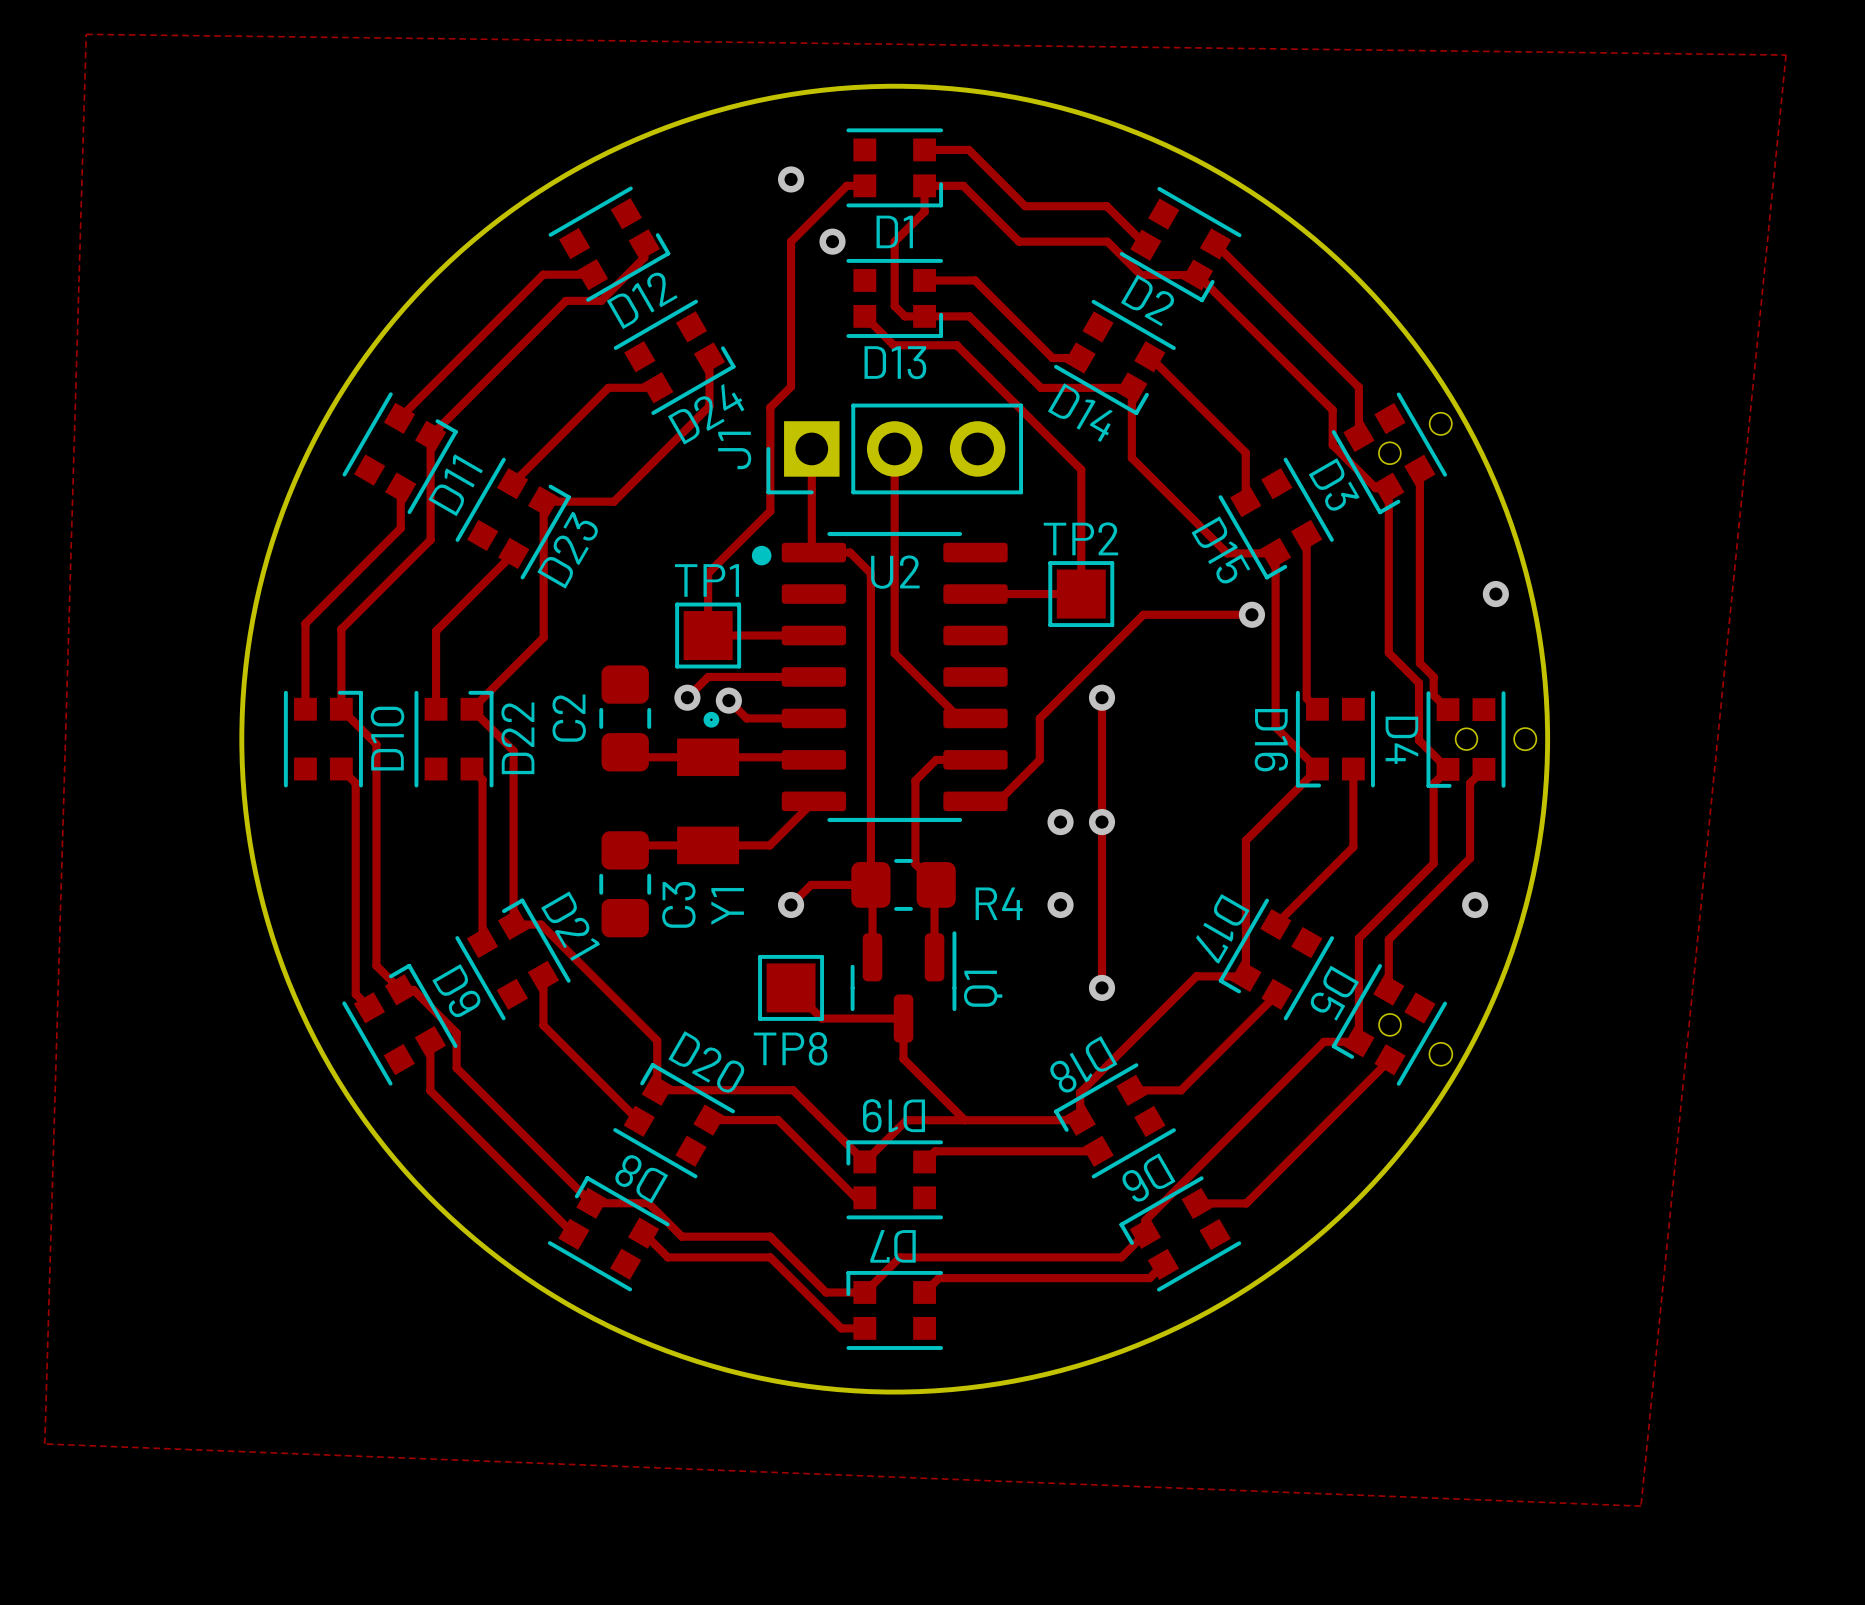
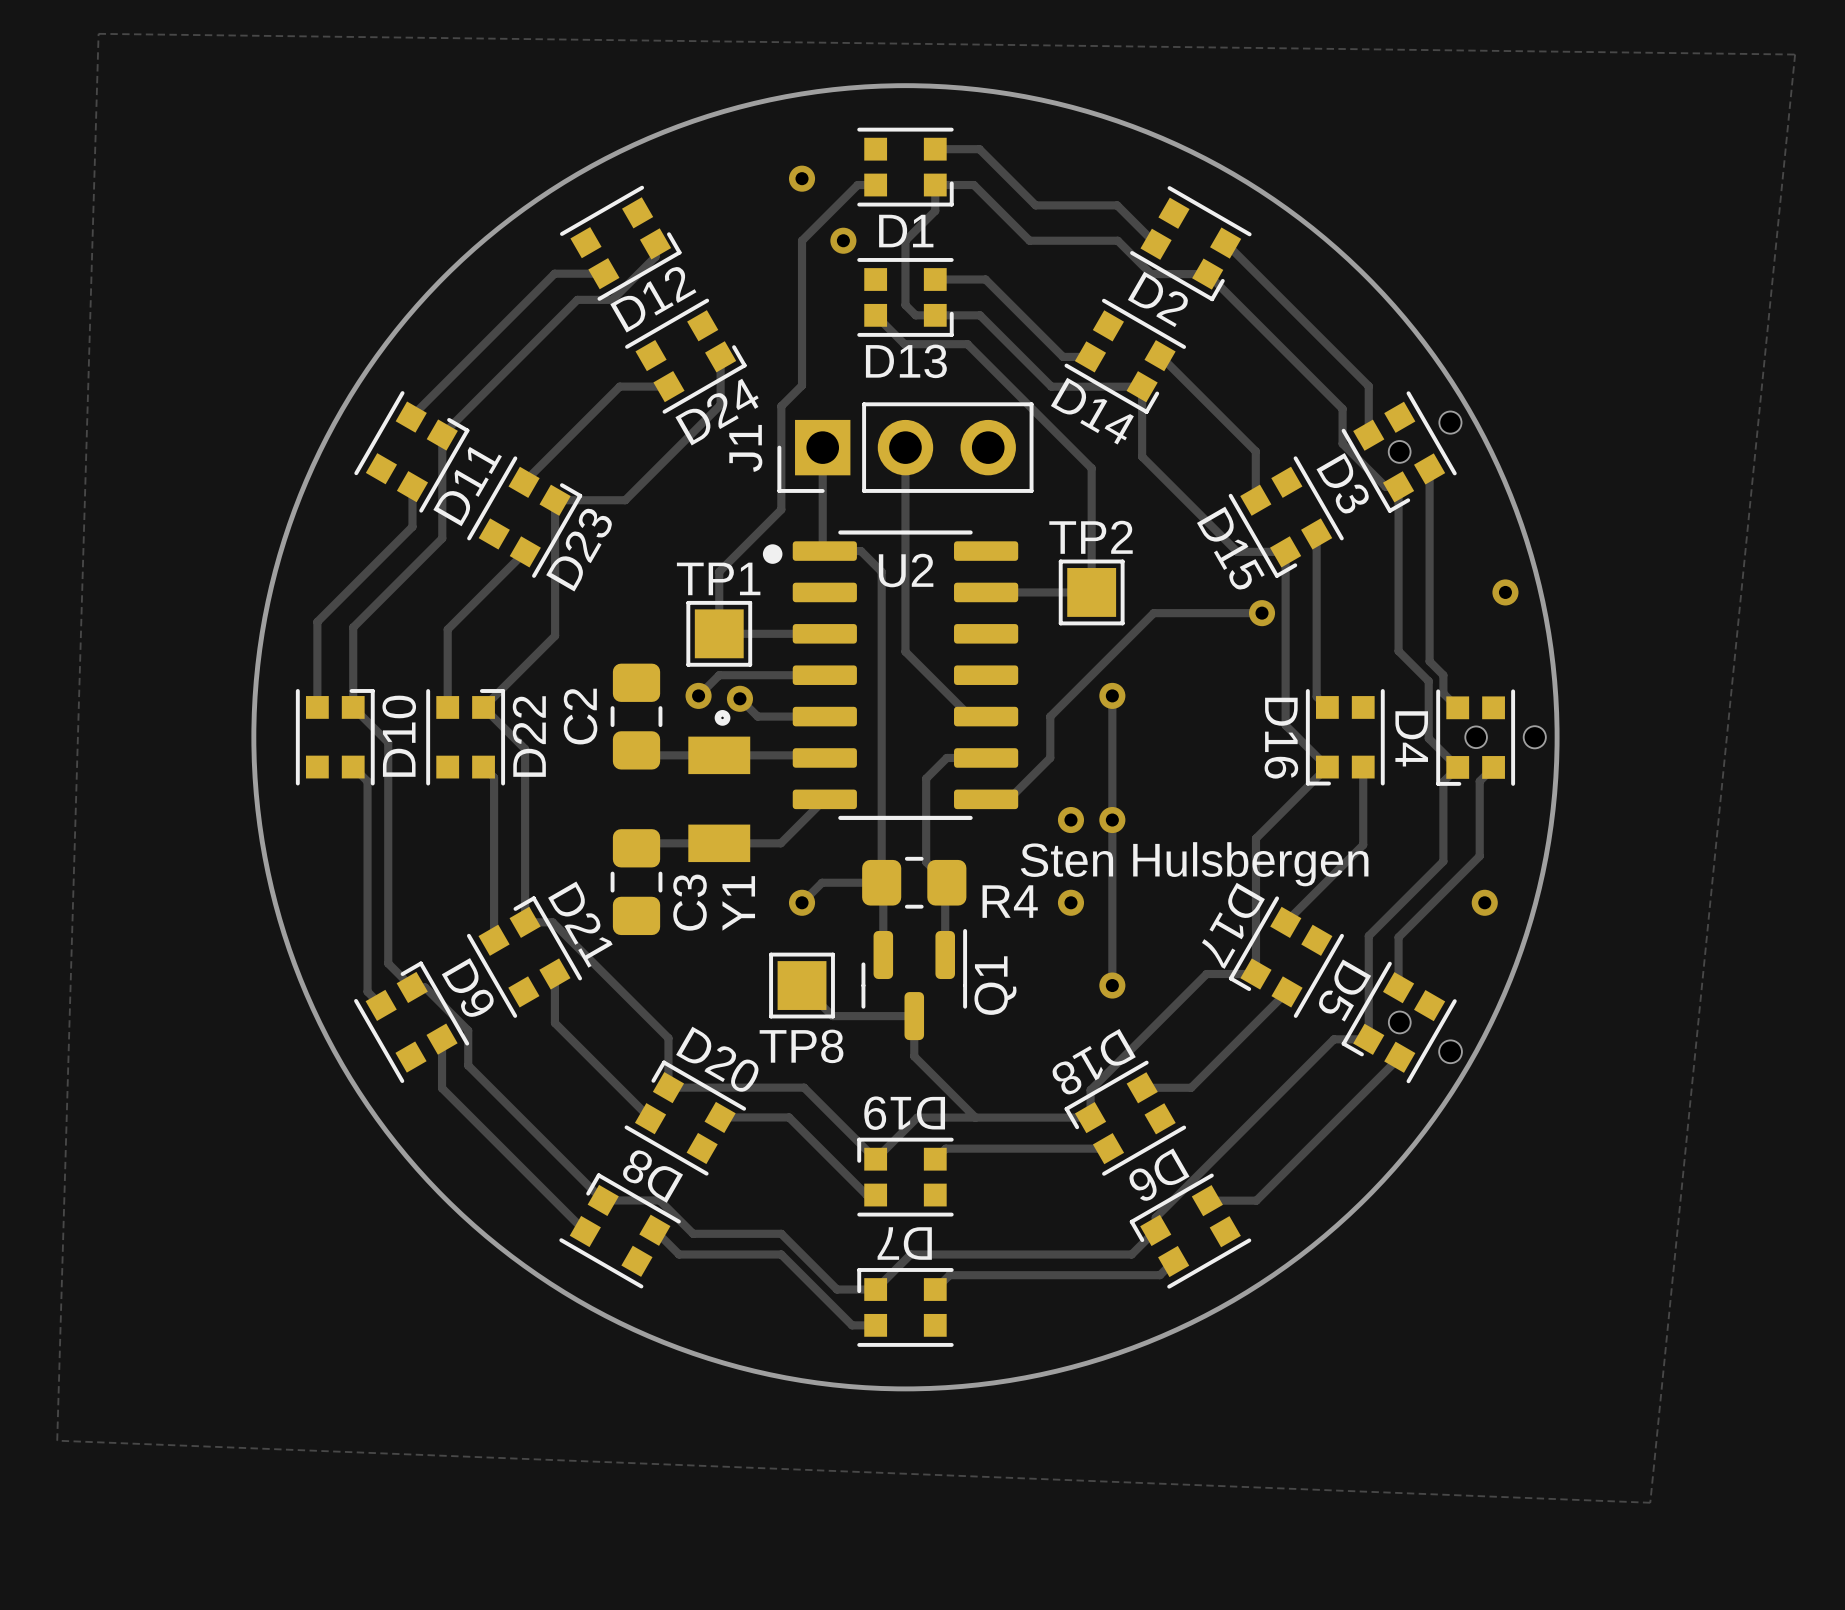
text: none -> Sten Hulsbergen (1194, 864)

